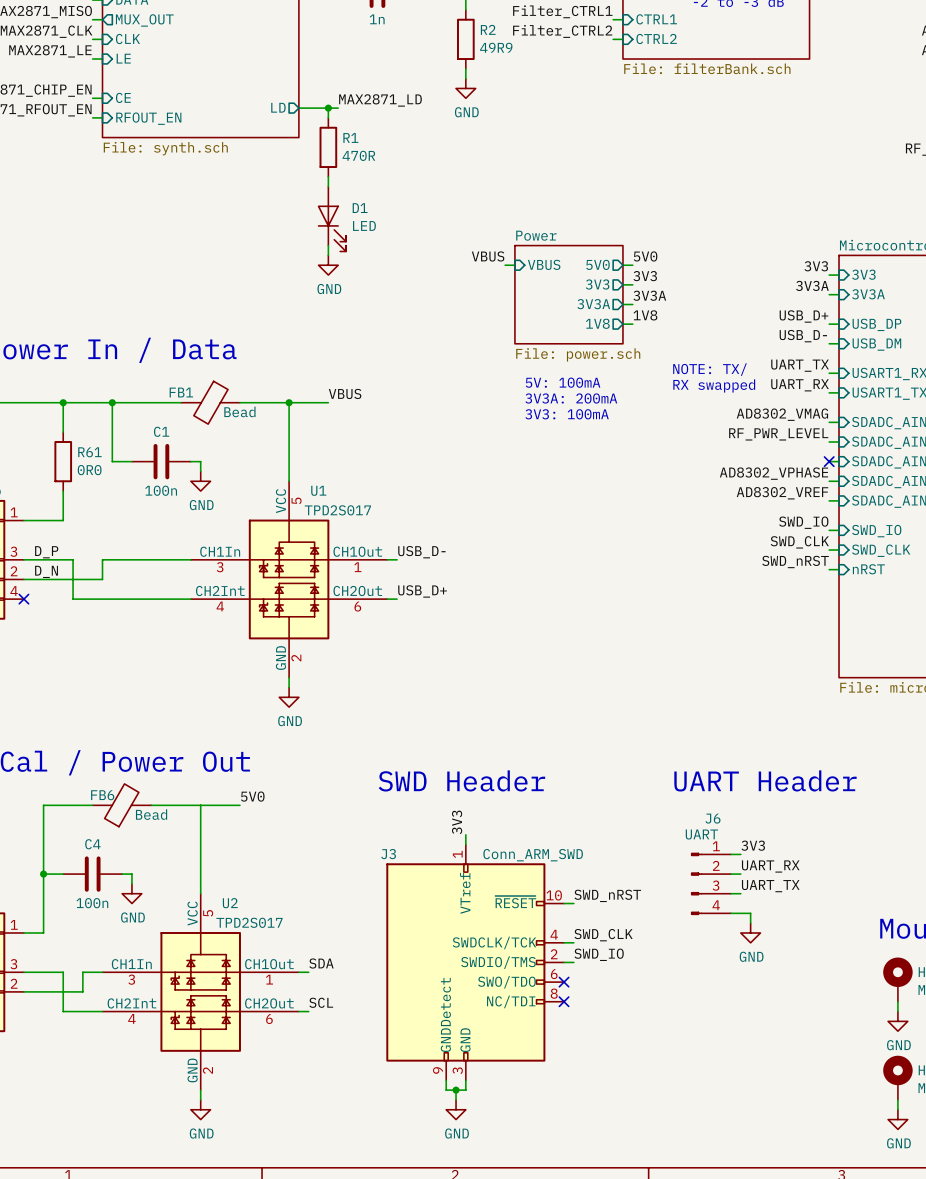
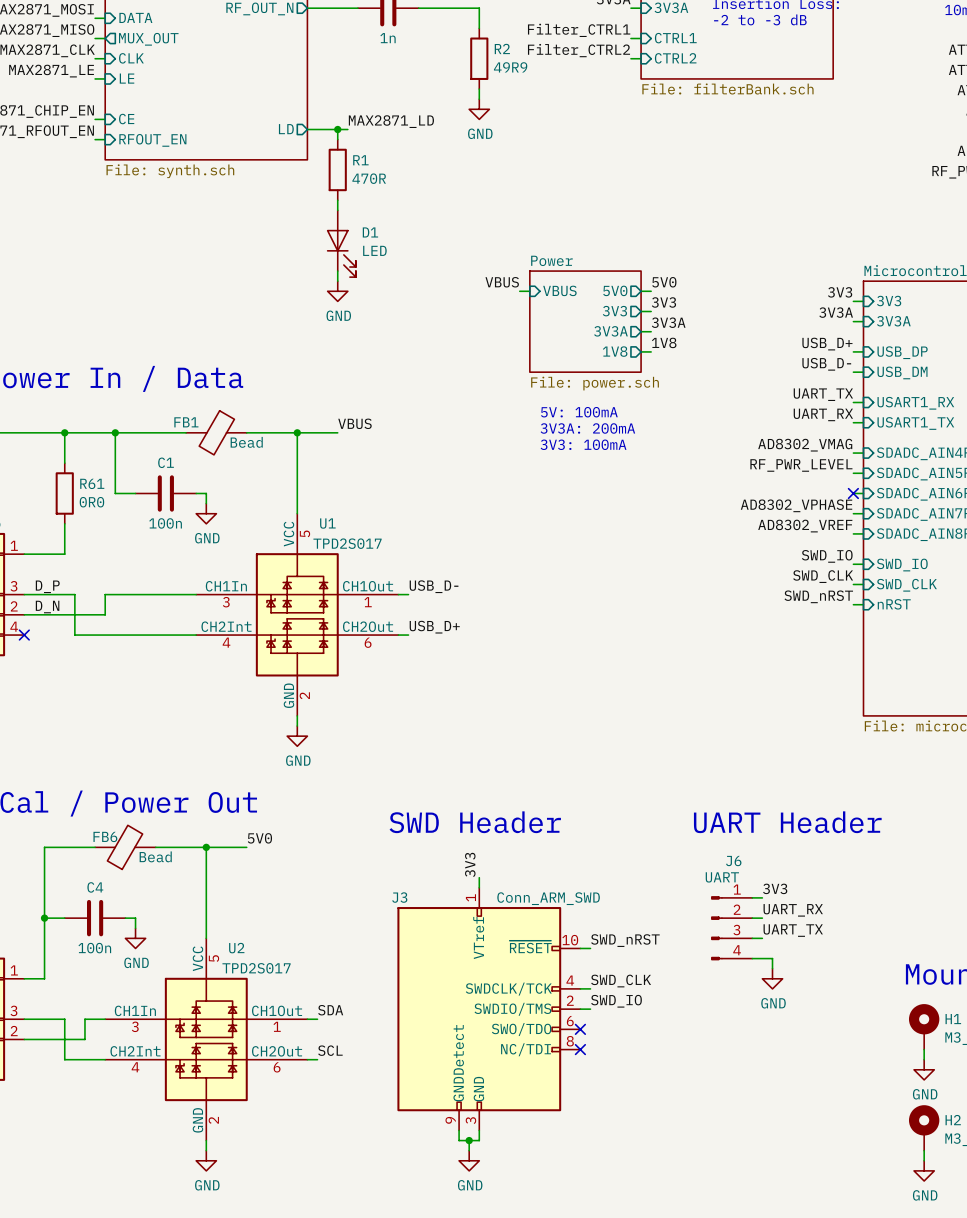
text: NOTE: TX/ (709, 369) -> none
text: RX swapped (714, 385) -> none
junction: none -> (206, 847)

